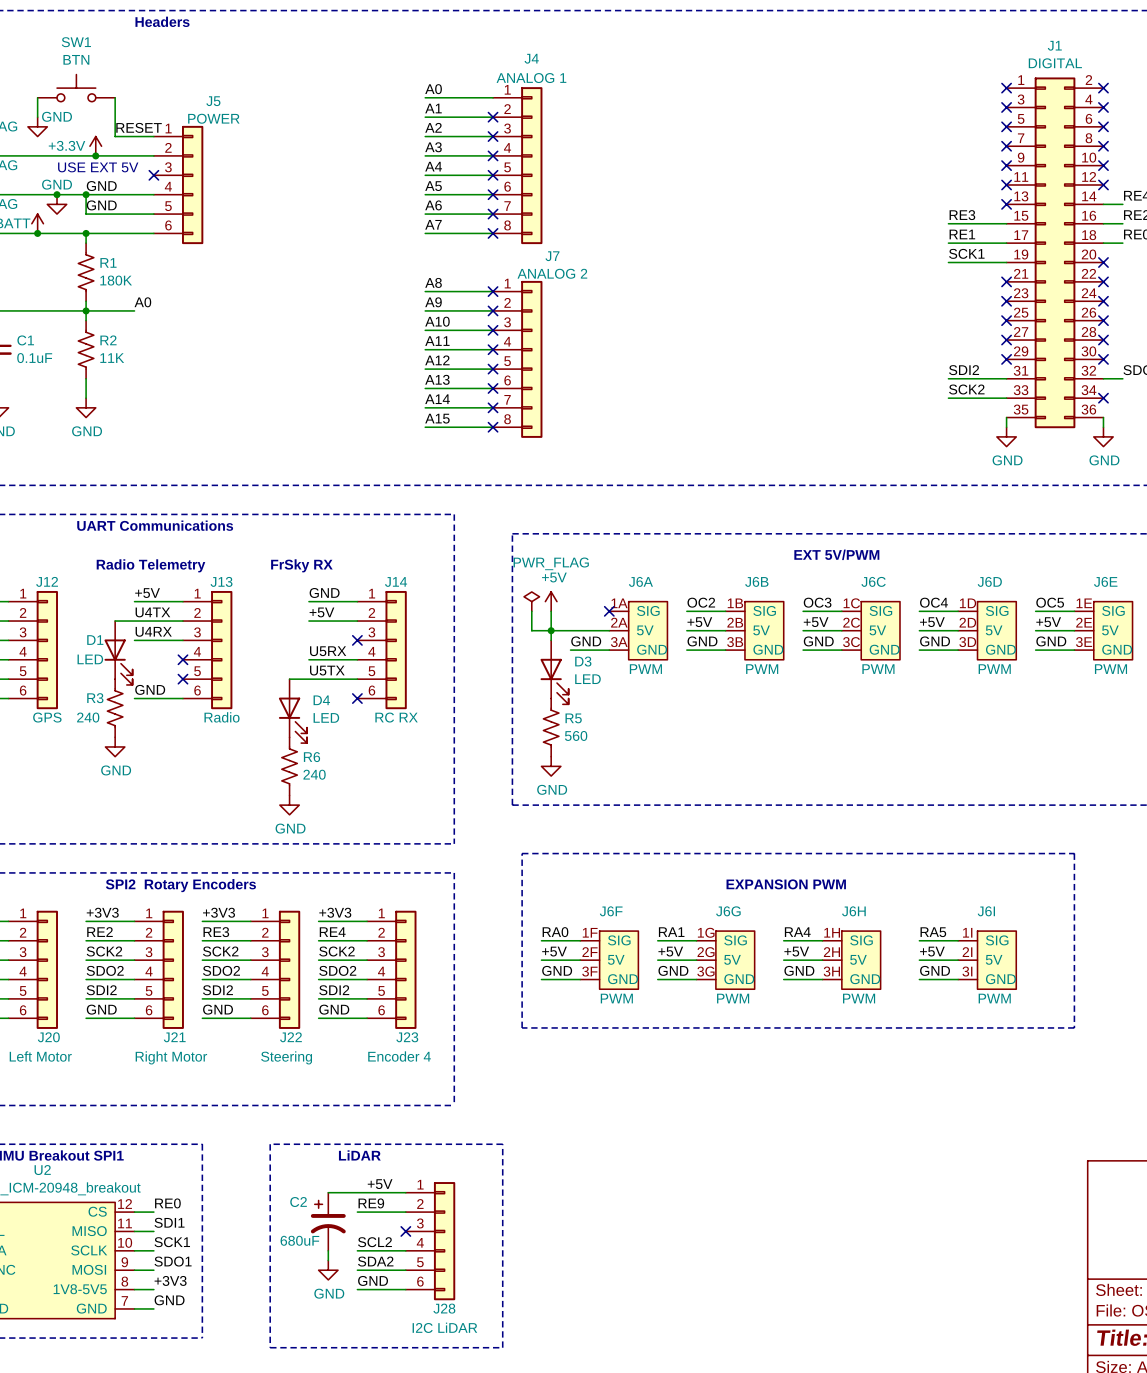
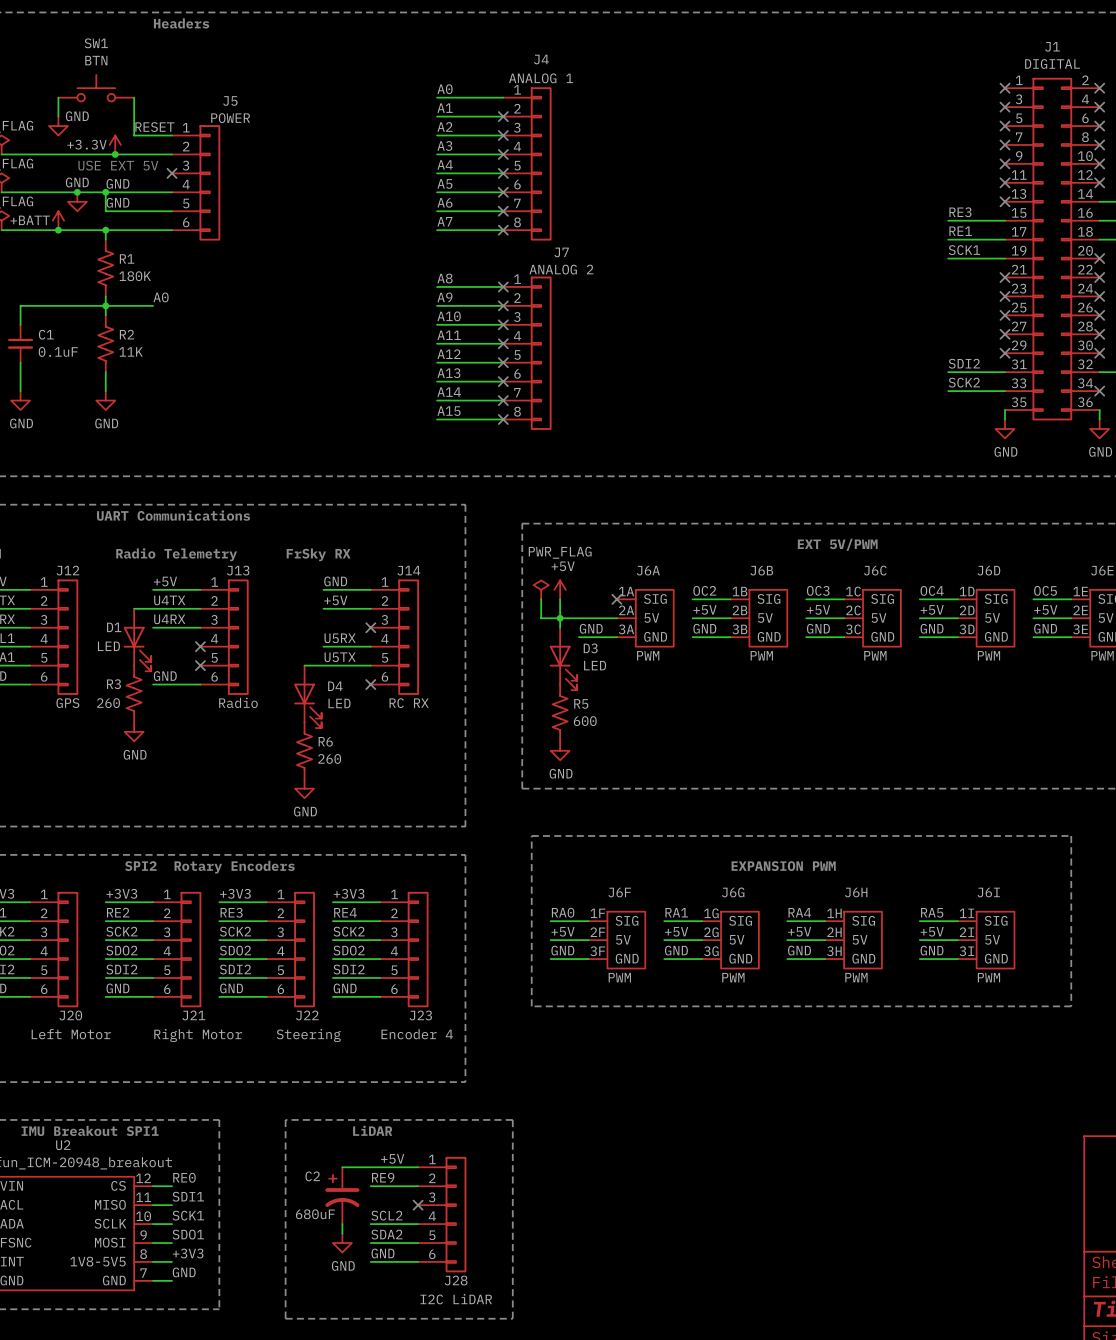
R3 value: 240 (88, 717) -> 260 (108, 703)
R5 value: 560 (576, 735) -> 600 (585, 721)
R6 value: 240 (314, 774) -> 260 (329, 758)

